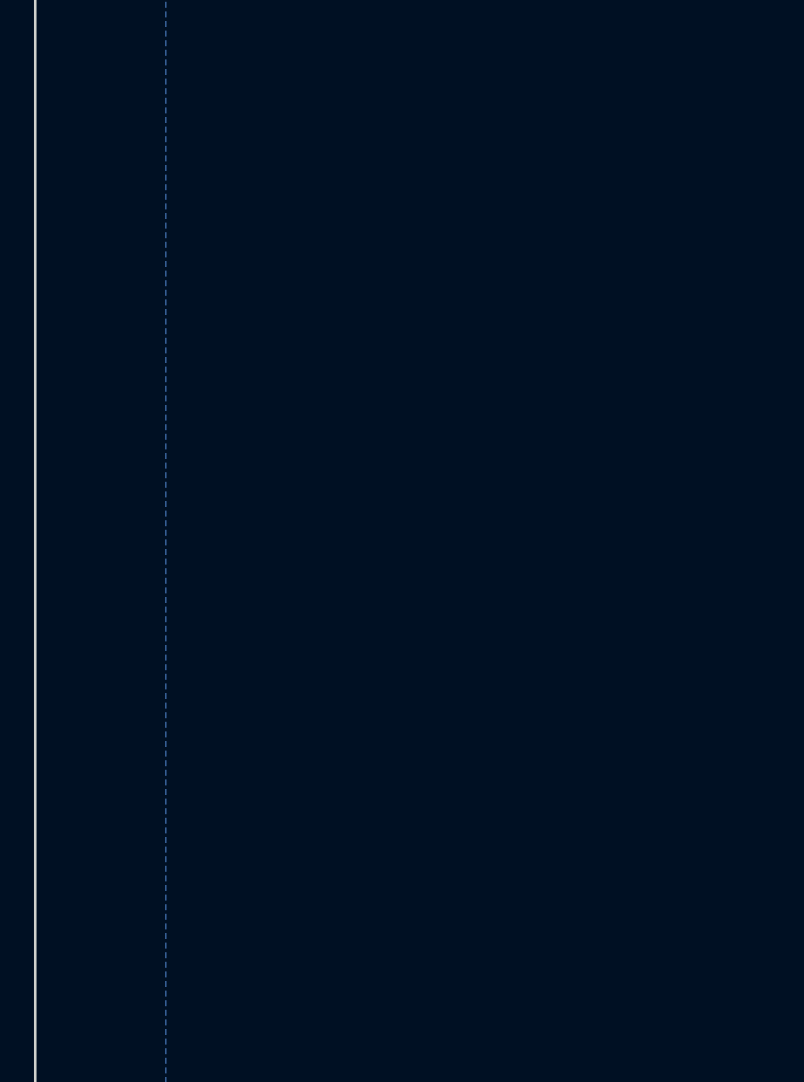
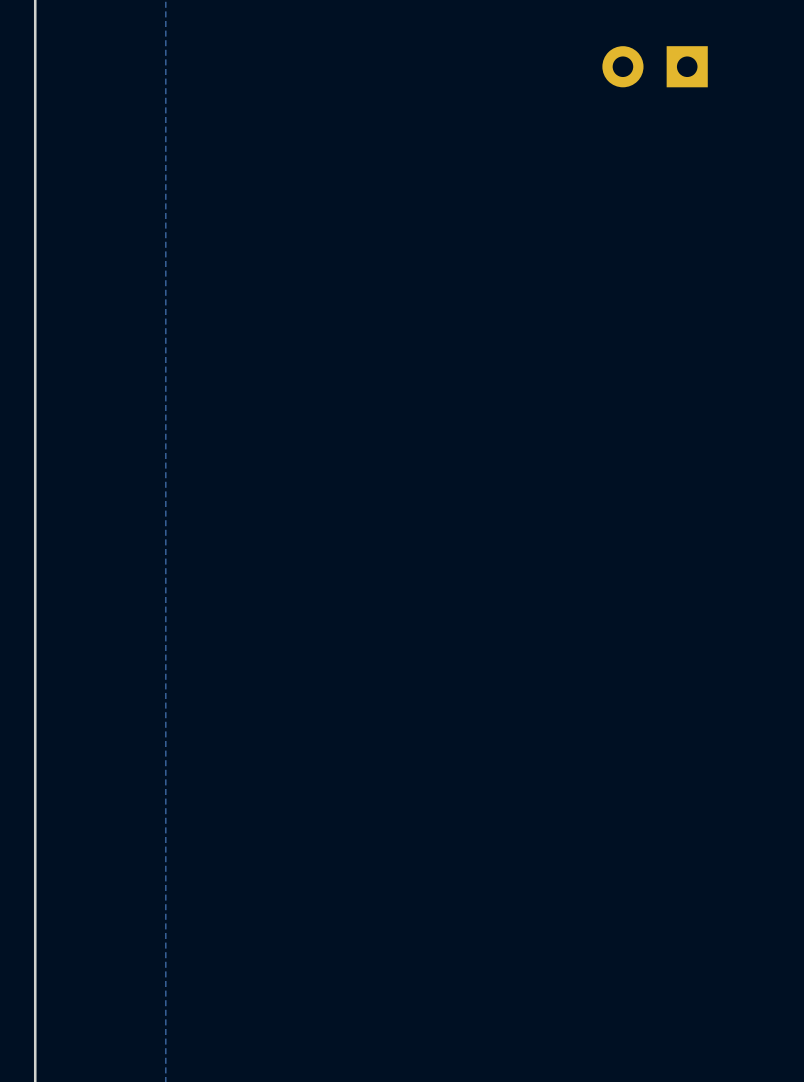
part: none -> (655, 66)

